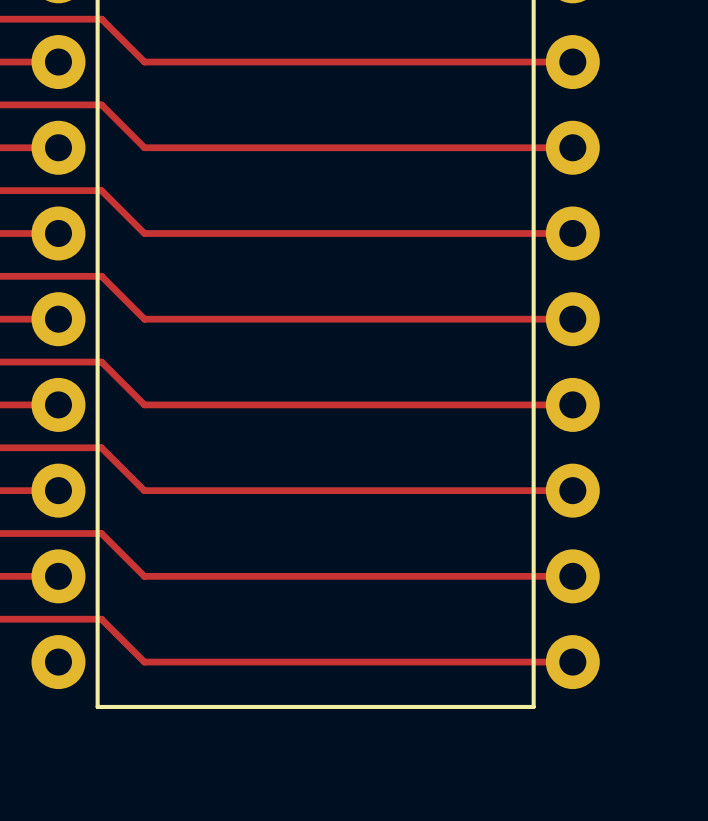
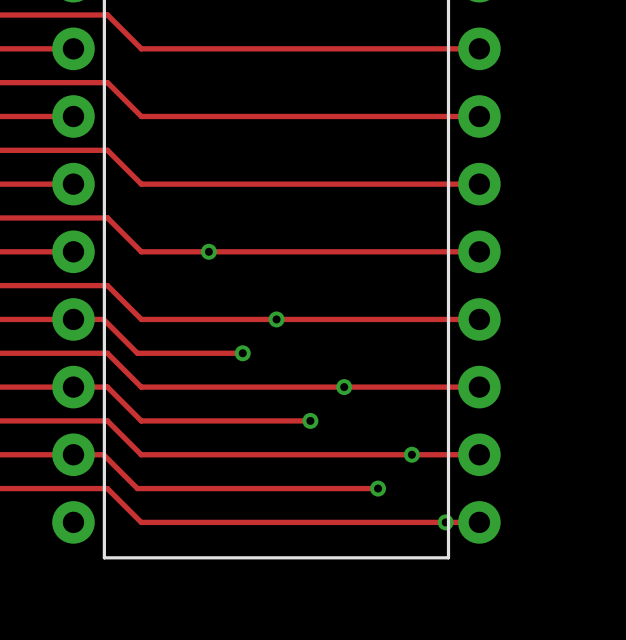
via: none -> (208, 251)
track: none -> (73, 319) (103, 319) (137, 353) (242, 353)
via: none -> (276, 319)
via: none -> (242, 353)
track: none -> (73, 387) (107, 387) (141, 420) (310, 420)
via: none -> (344, 387)
via: none -> (310, 420)
track: none -> (73, 454) (103, 454) (137, 488) (378, 488)
via: none -> (411, 454)
via: none -> (378, 488)
via: none -> (445, 522)

